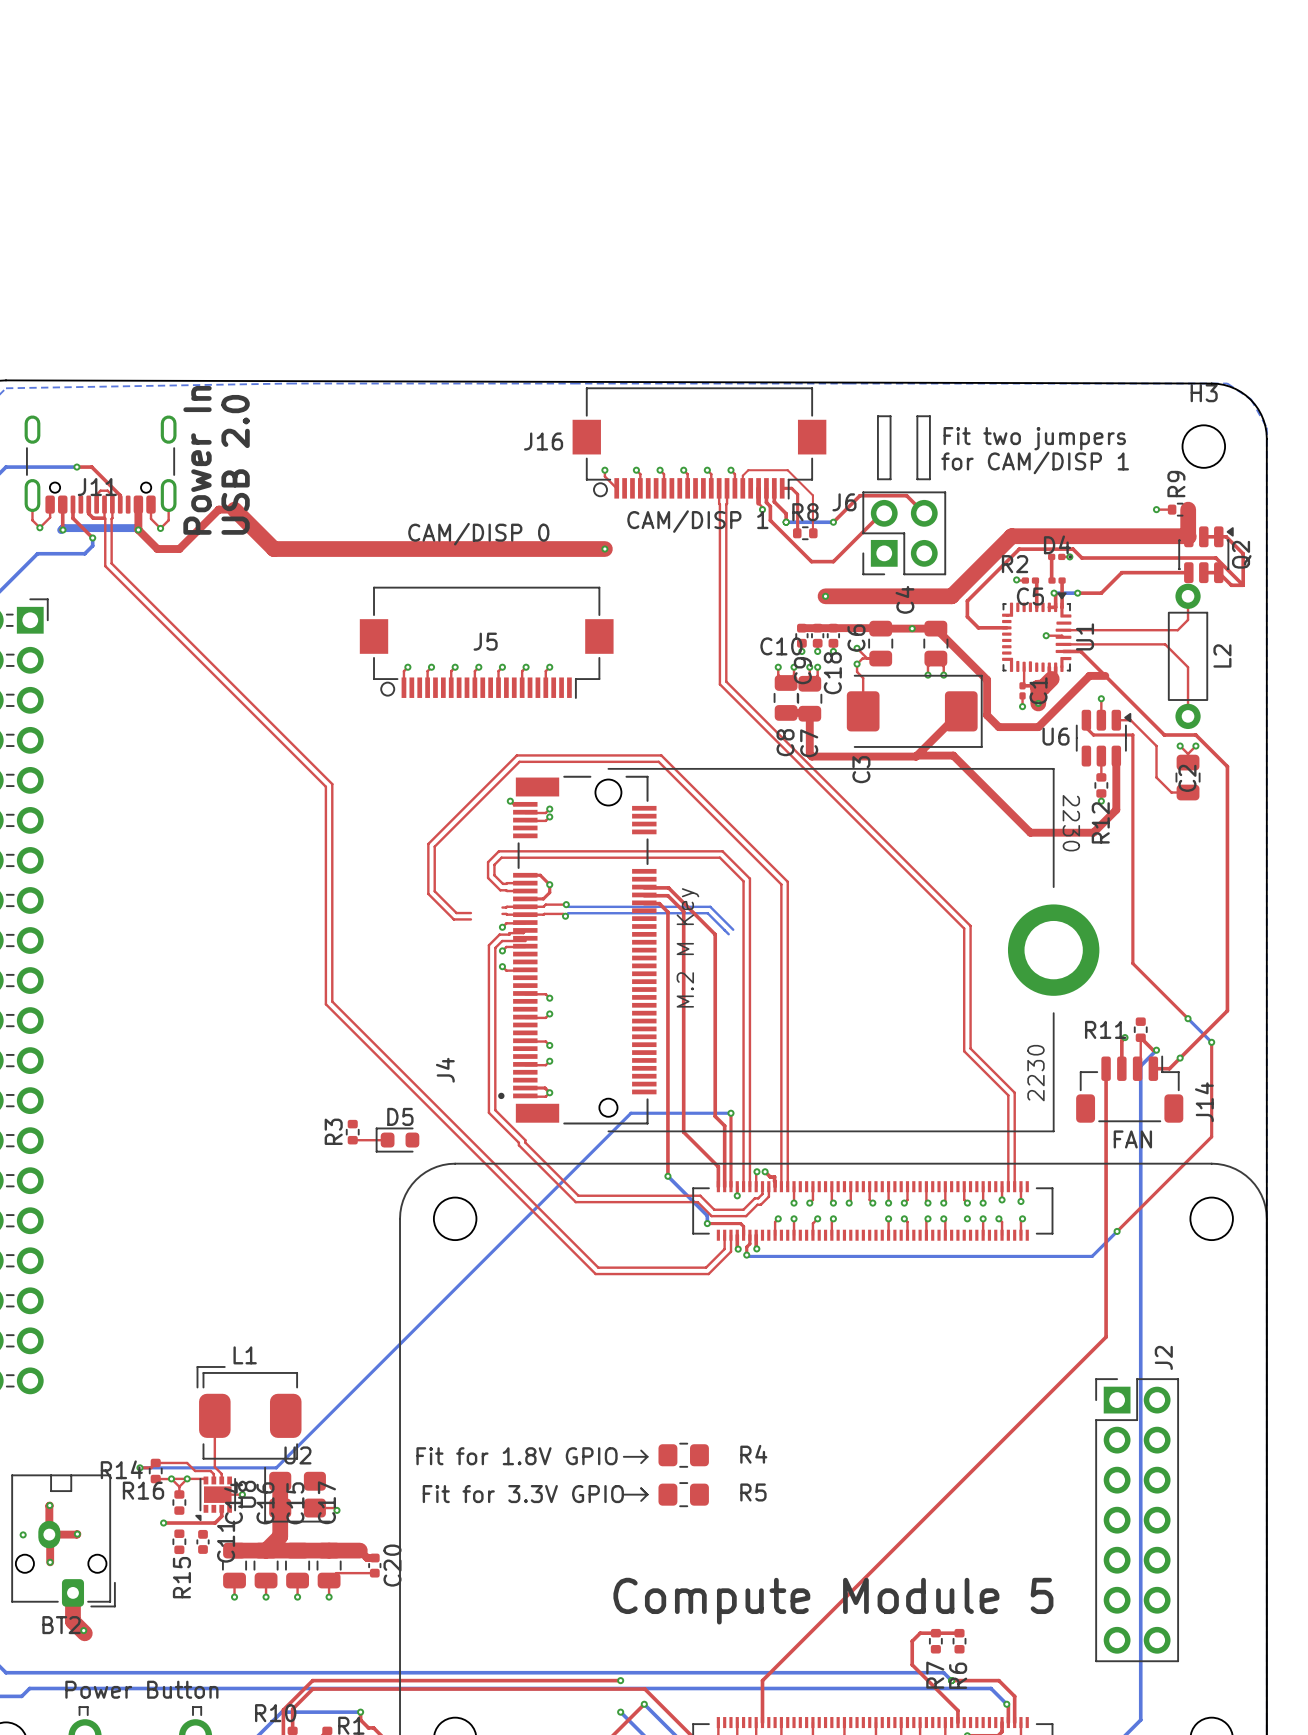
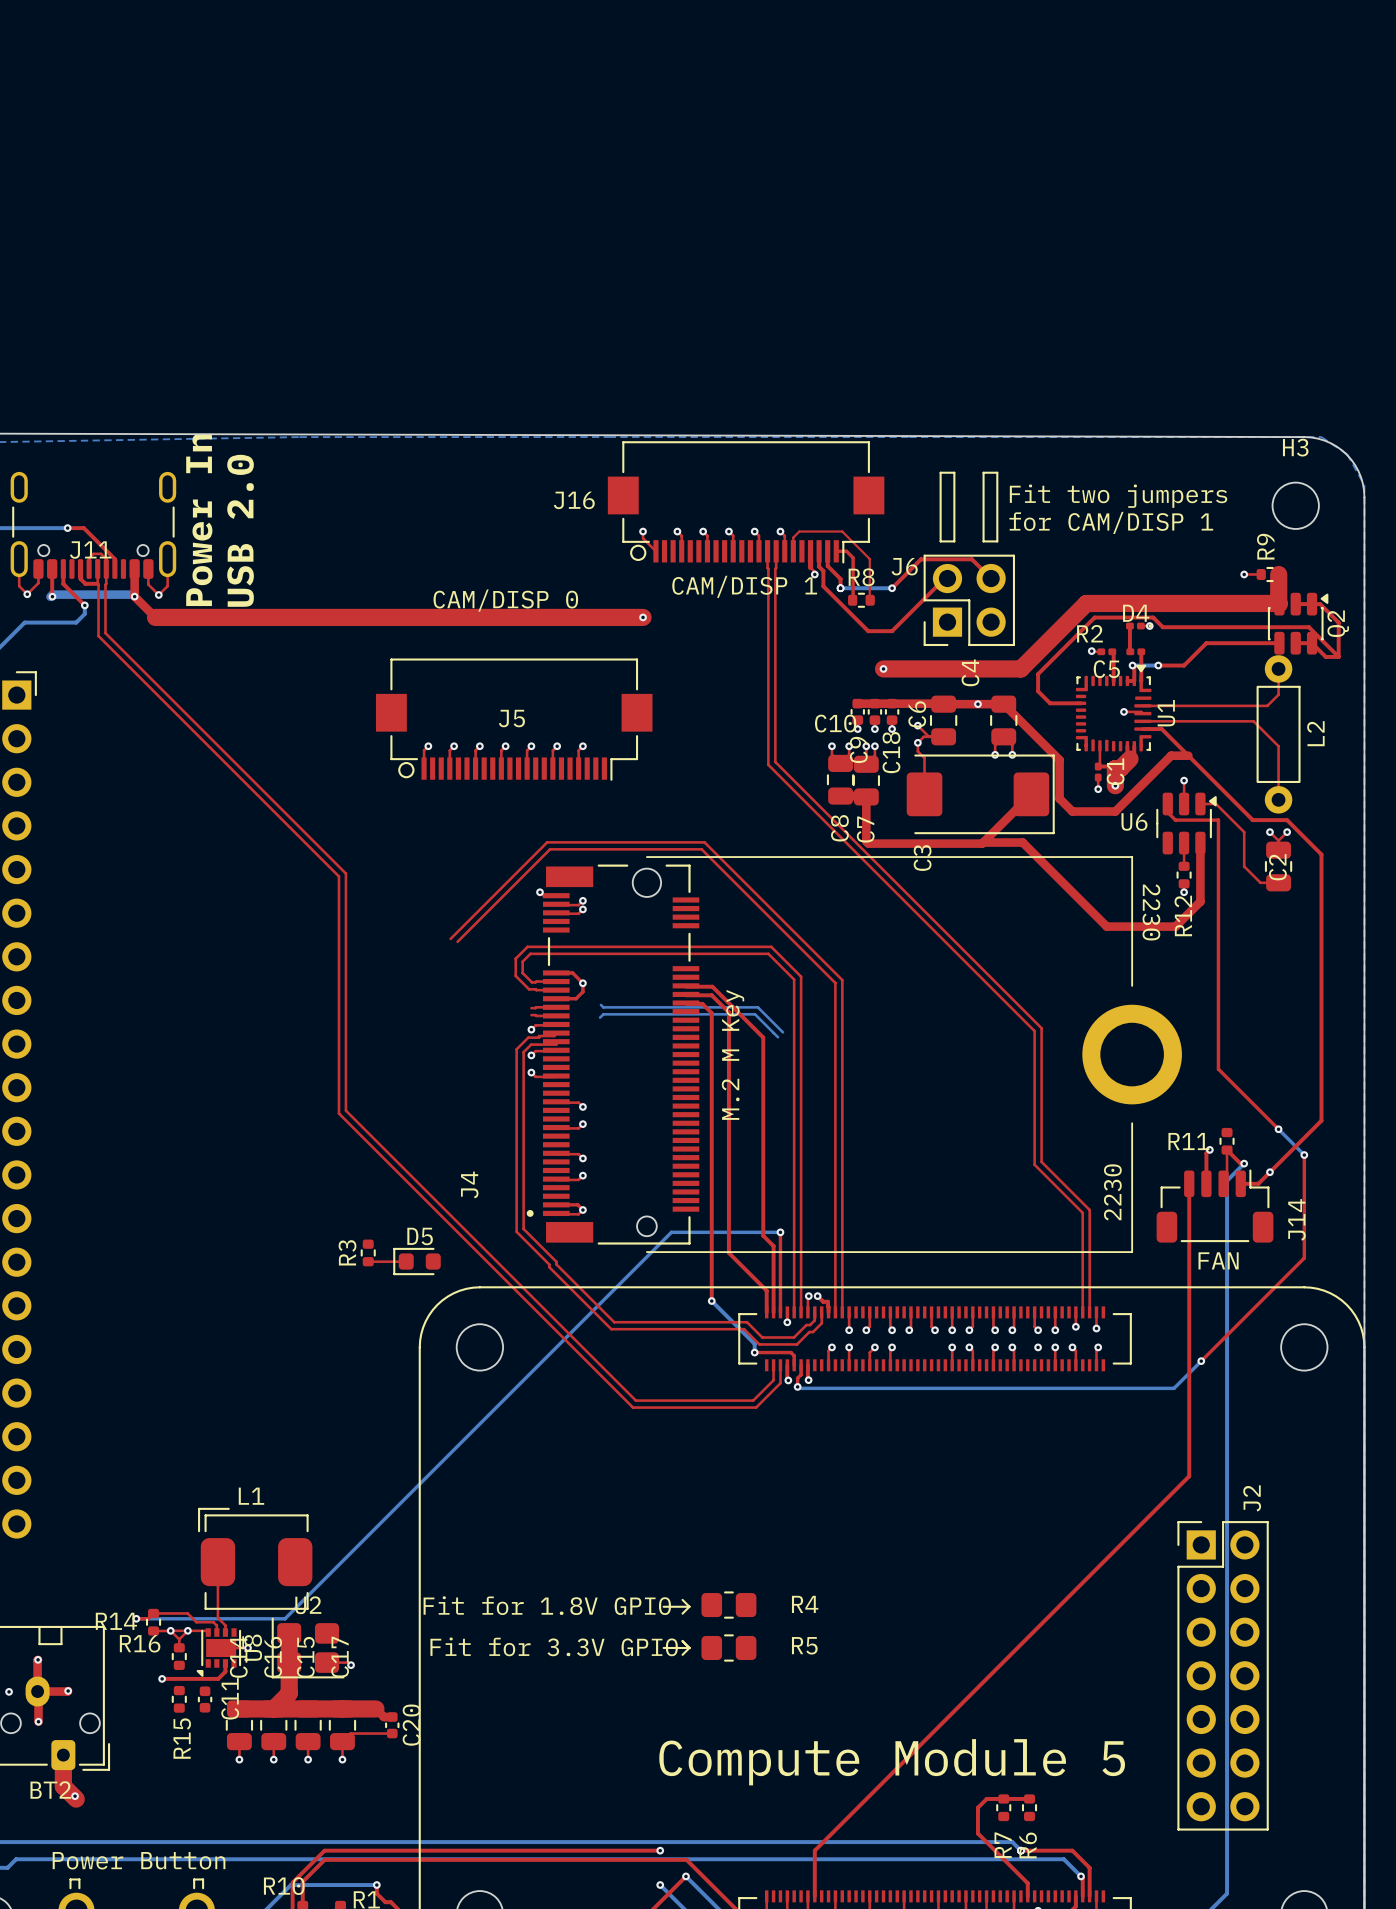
top track width: thin (157, 549) (179, 549) -> thick (155, 617) (179, 617)
top track: (179, 549) (218, 509) (234, 509) (273, 549) -> (179, 617) (282, 617)
top track: (428, 843) (428, 893) (453, 919) (470, 919) -> none
top track: (434, 846) (434, 891) (456, 913) (470, 913) -> none
top track: (566, 904) (525, 906) -> none
via: (566, 904) -> none
top track: (525, 914) (563, 913) (565, 916) -> none
via: (565, 916) -> none

